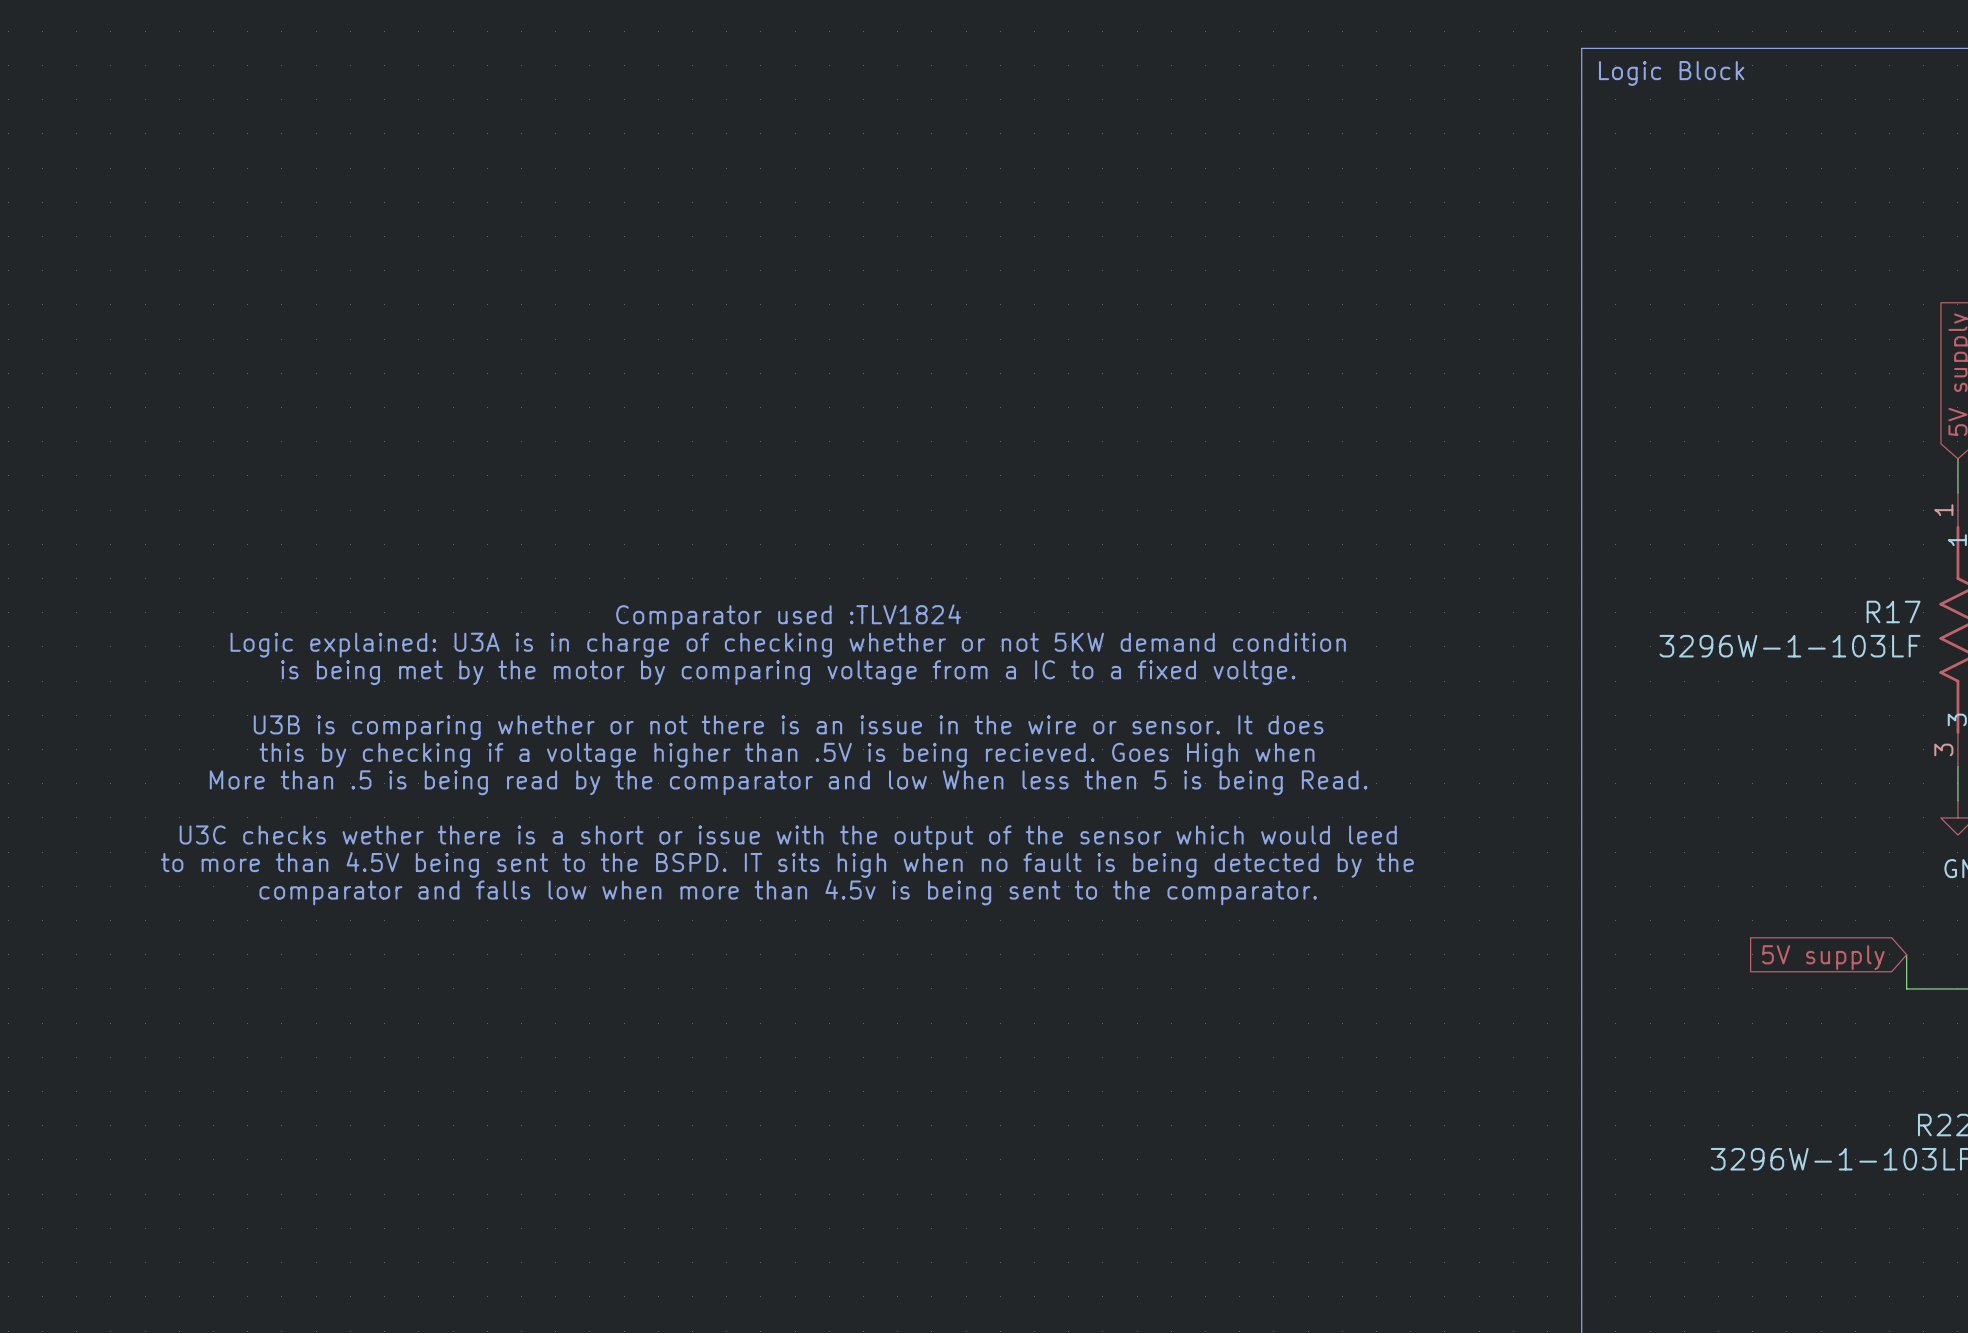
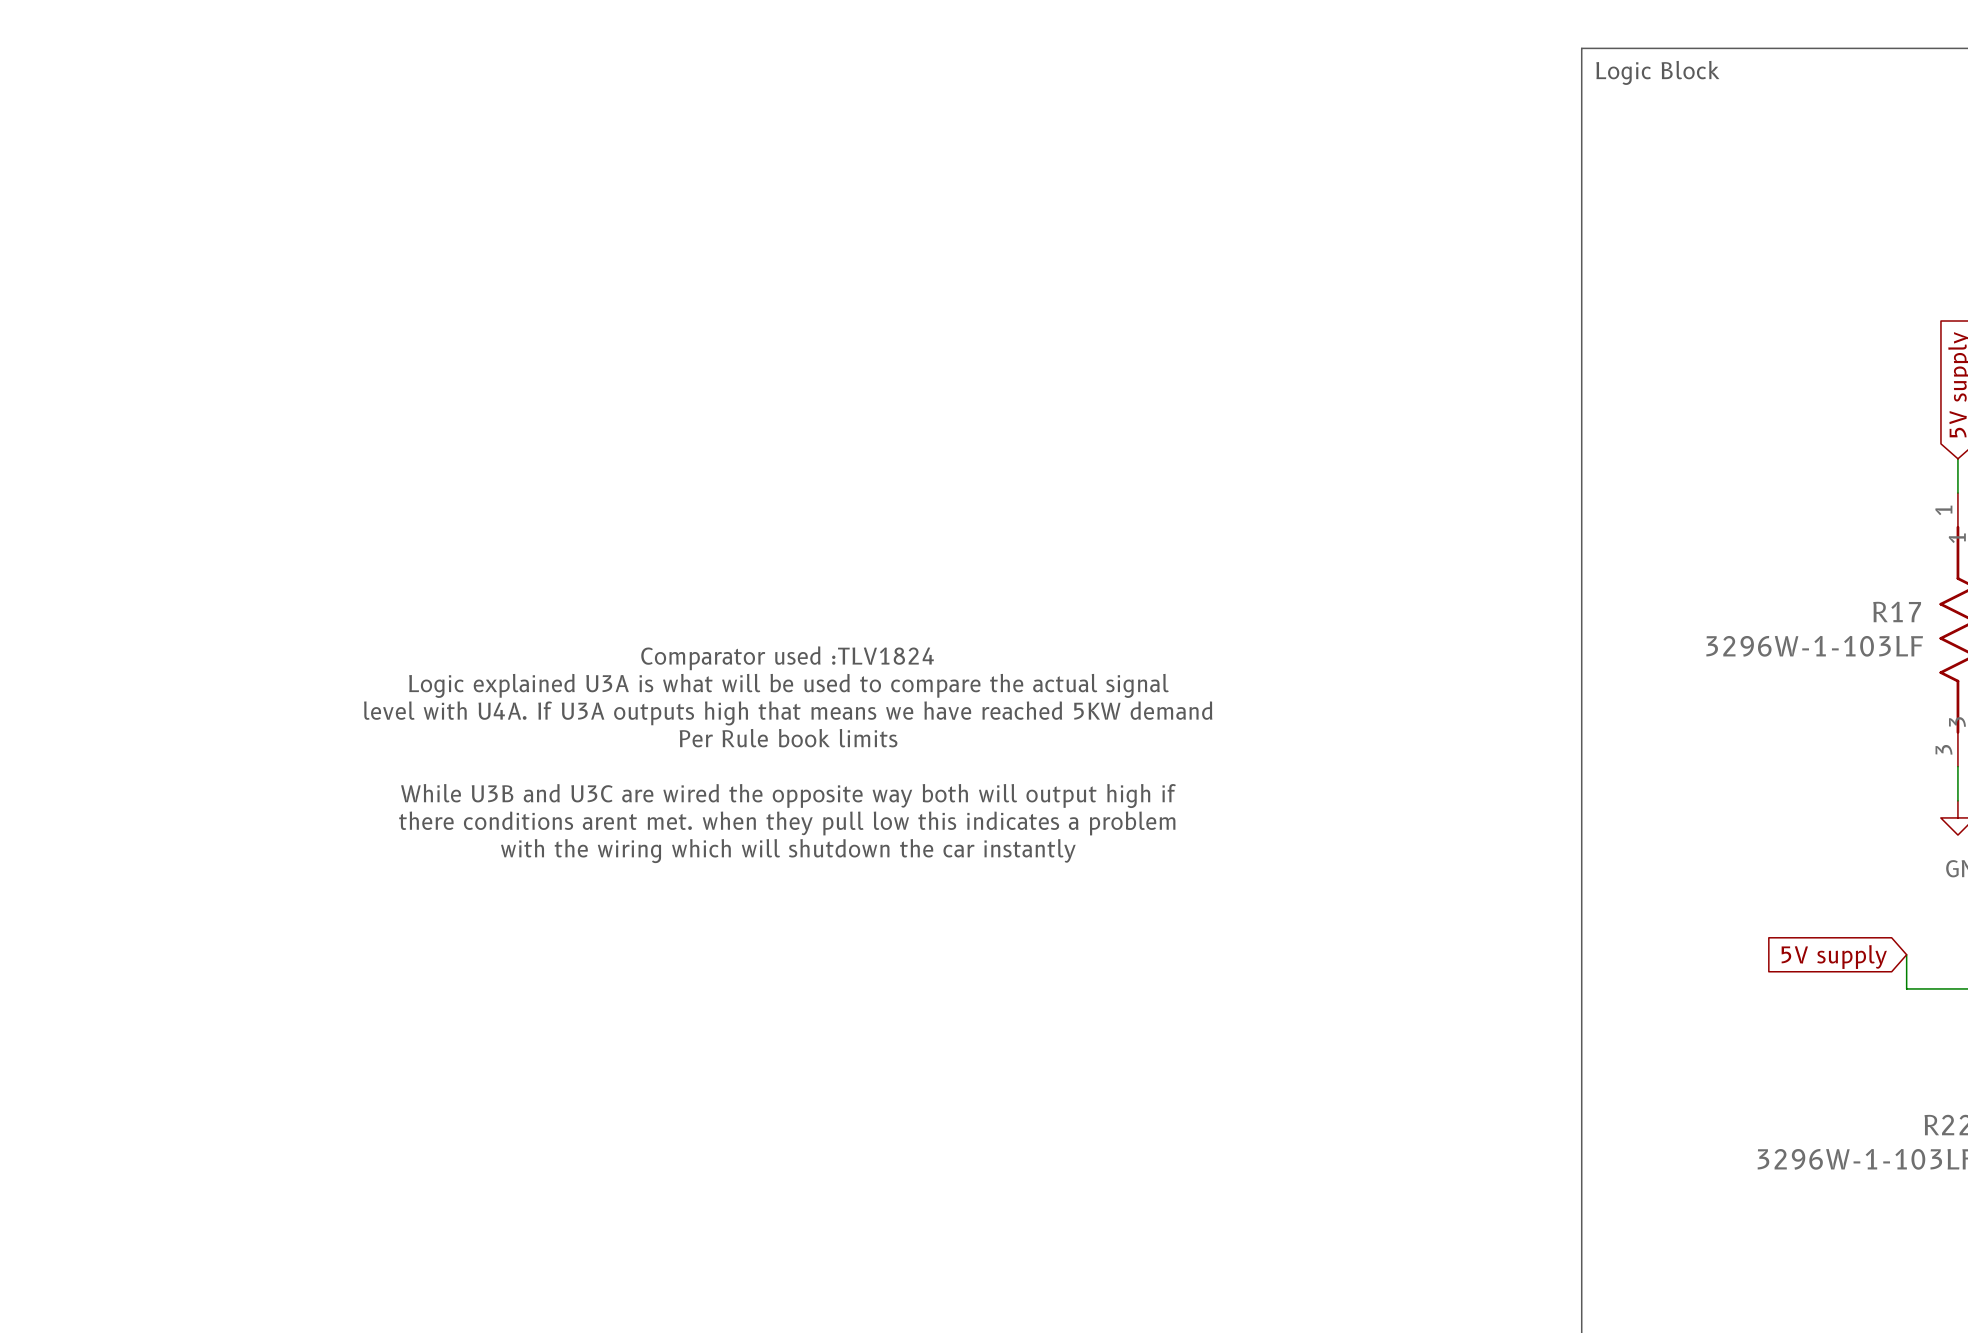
text position: Comparator used :TLV1824 (788, 617) -> Comparator used :TLV1824 (787, 658)
text: Logic explained: U3A is in charge of checking whether or not 5KW demand condition (788, 645) -> none
text: is being met by the motor by comparing voltage from a IC to a fixed voltge. (788, 672) -> none
text: none -> Logic explained U3A is what will be used to compare the actual signal (788, 685)
text: none -> level with U4A. If U3A outputs high that means we have reached 5KW demand (788, 713)
text: U3B is comparing whether or not there is an issue in the wire or sensor. It does (788, 727) -> none
text: none -> Per Rule book limits (788, 738)
text: this by checking if a voltage higher than .5V is being recieved. Goes High when (786, 755) -> none
text: More than .5 is being read by the comparator and low When less then 5 is being Read. (788, 782) -> none
text: none -> While U3B and U3C are wired the opposite way both will output high if (788, 796)
text: none -> there conditions arent met. when they pull low this indicates a problem (787, 823)
text: U3C checks wether there is a short or issue with the output of the sensor which would leed (788, 837) -> none
text: none -> with the wiring which will shutdown the car instantly (788, 851)
text: to more than 4.5V being sent to the BSPD. IT sits high when no fault is being detected by the (787, 864) -> none
text: comparator and falls low when more than 4.5v is being sent to the comparator. (788, 892) -> none

